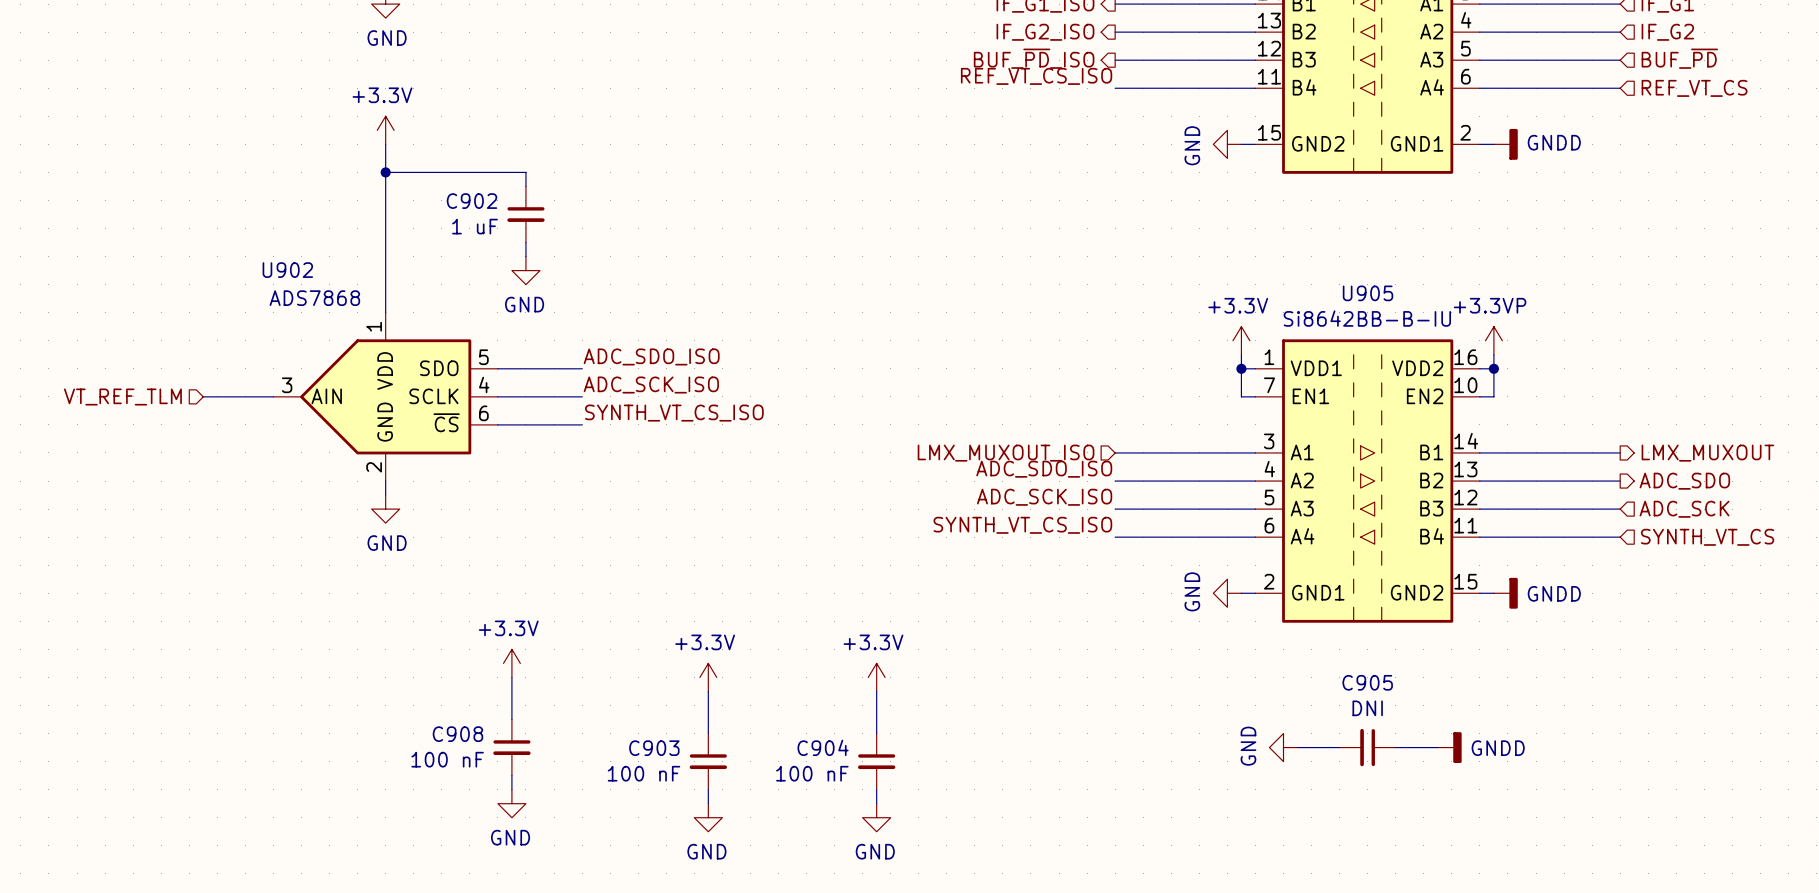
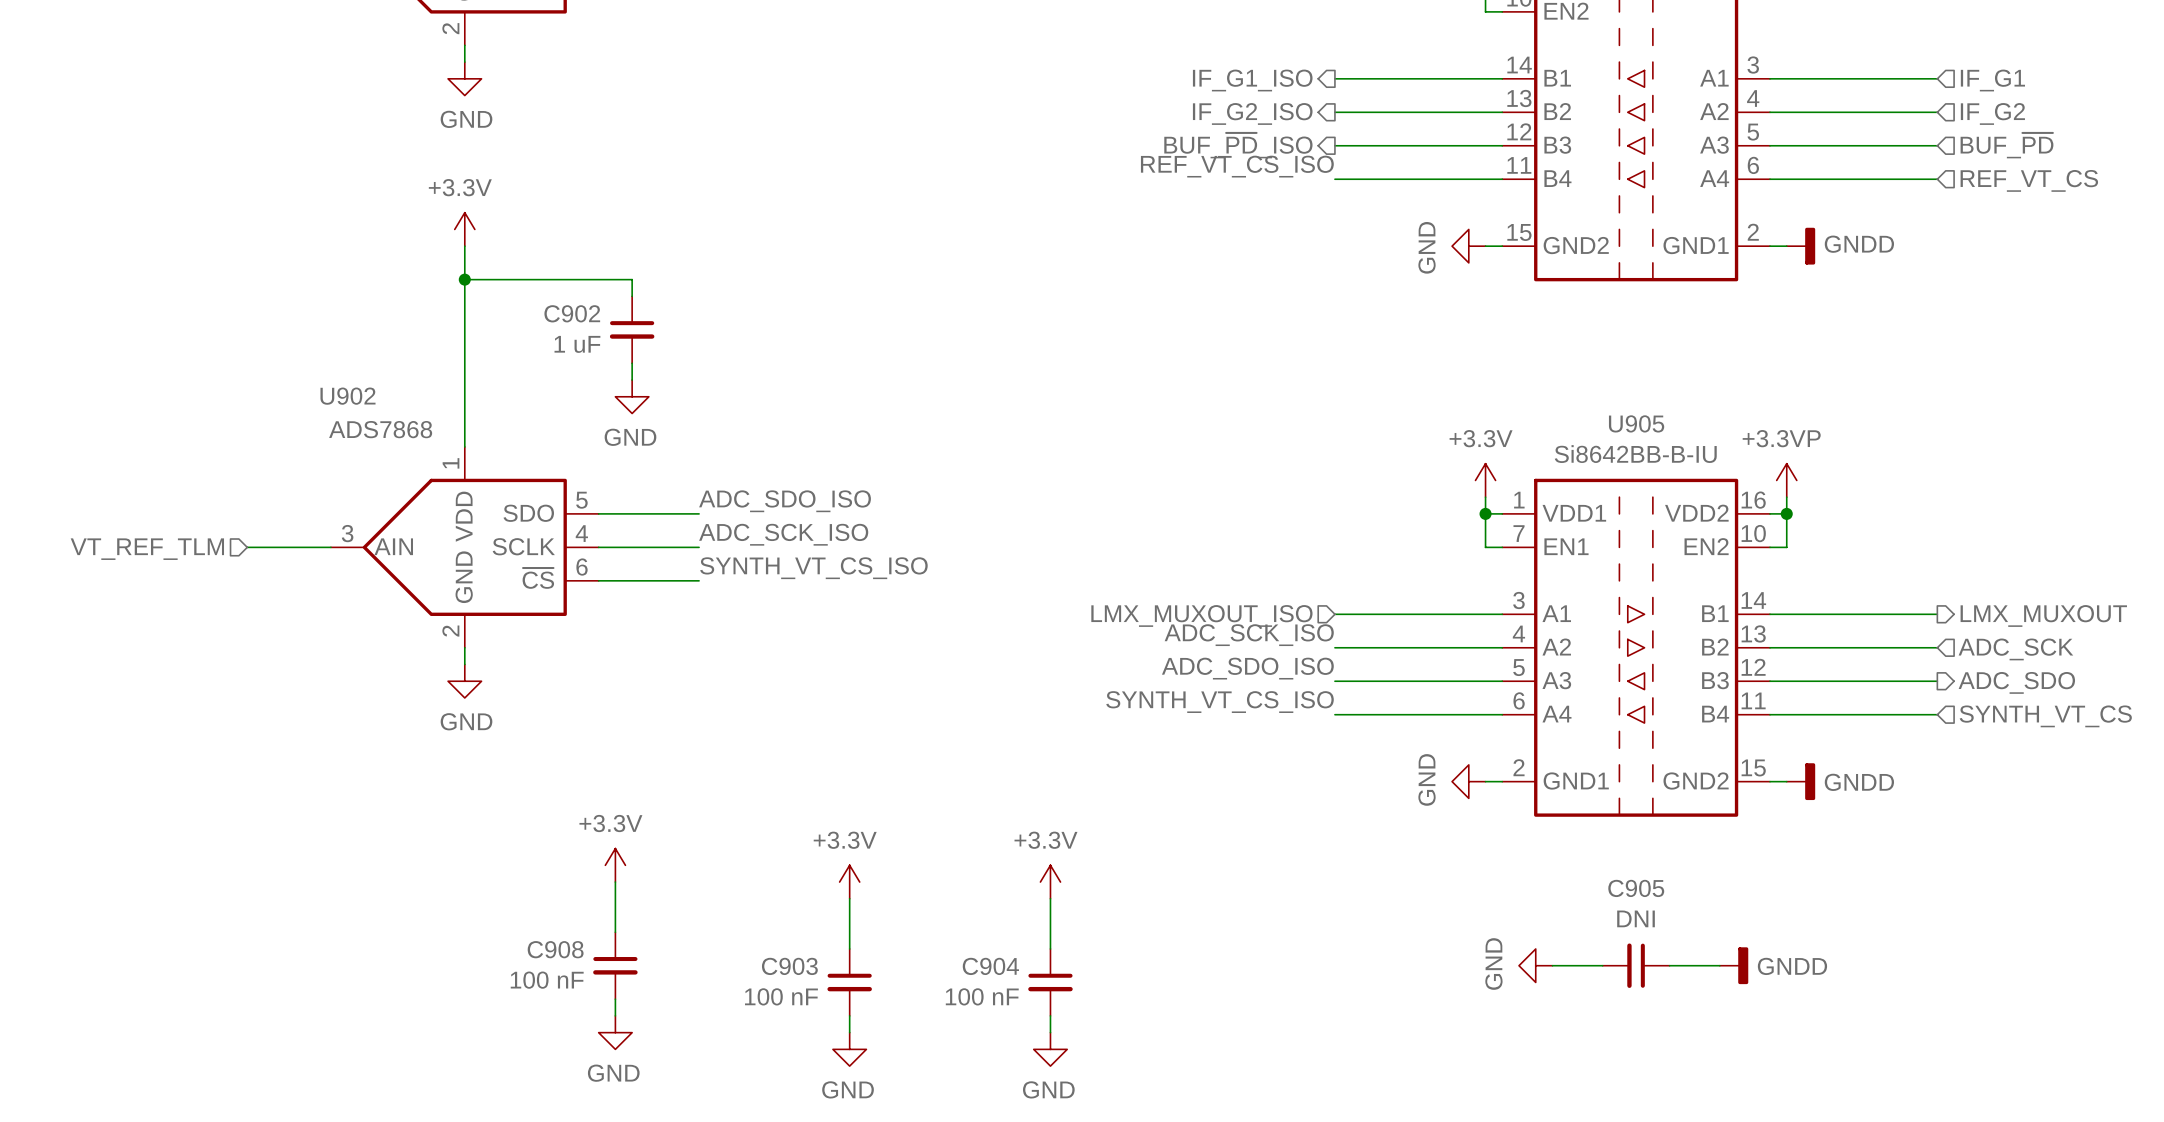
label: ADC_SDO_ISO (1044, 469) -> ADC_SCK_ISO (1249, 635)
hierarchical label shape: output (1684, 481) -> input (2015, 649)
hierarchical label: ADC_SDO (1684, 481) -> ADC_SCK (2015, 649)
label: ADC_SCK_ISO (1044, 497) -> ADC_SDO_ISO (1247, 668)
hierarchical label shape: input (1684, 509) -> output (2016, 682)
hierarchical label: ADC_SCK (1684, 509) -> ADC_SDO (2016, 682)

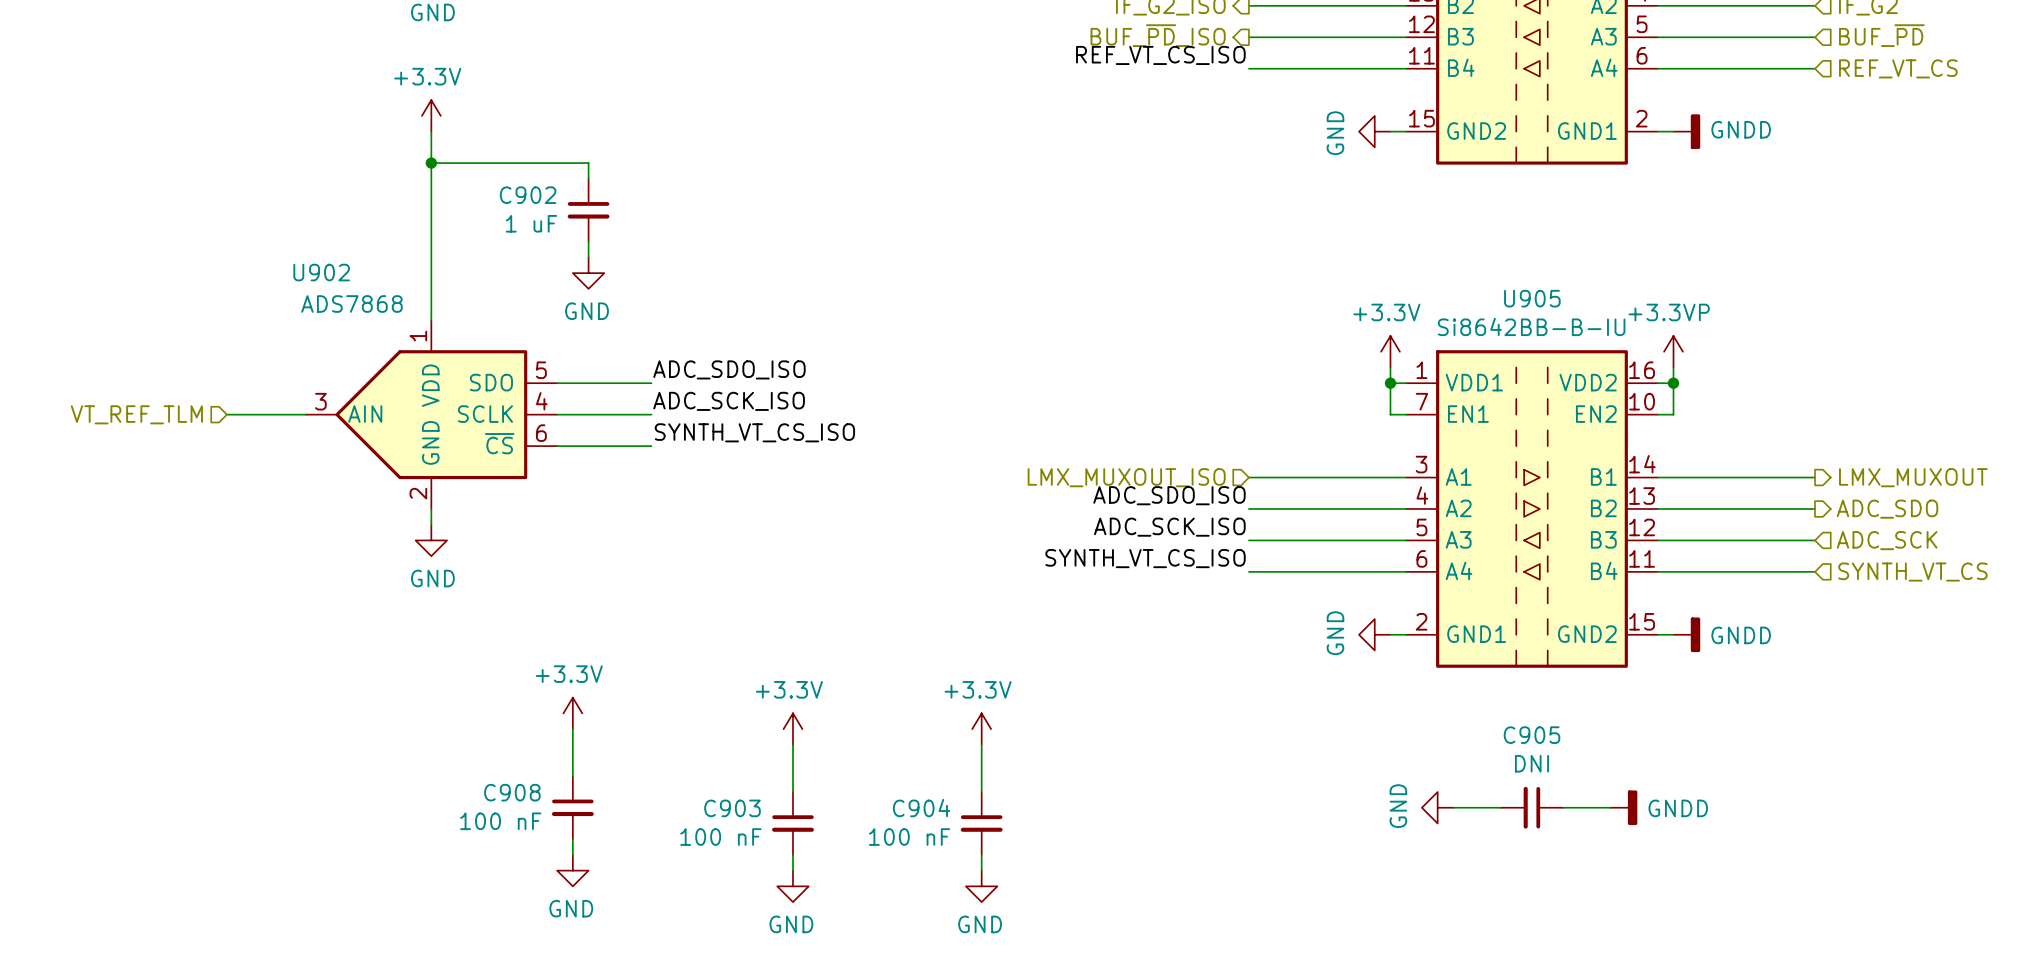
label: ADC_SCK_ISO (1249, 635) -> ADC_SDO_ISO (1169, 495)
hierarchical label shape: input (2015, 649) -> output (1887, 509)
hierarchical label: ADC_SCK (2015, 649) -> ADC_SDO (1887, 509)
label: ADC_SDO_ISO (1247, 668) -> ADC_SCK_ISO (1169, 527)
hierarchical label shape: output (2016, 682) -> input (1887, 540)
hierarchical label: ADC_SDO (2016, 682) -> ADC_SCK (1887, 540)

